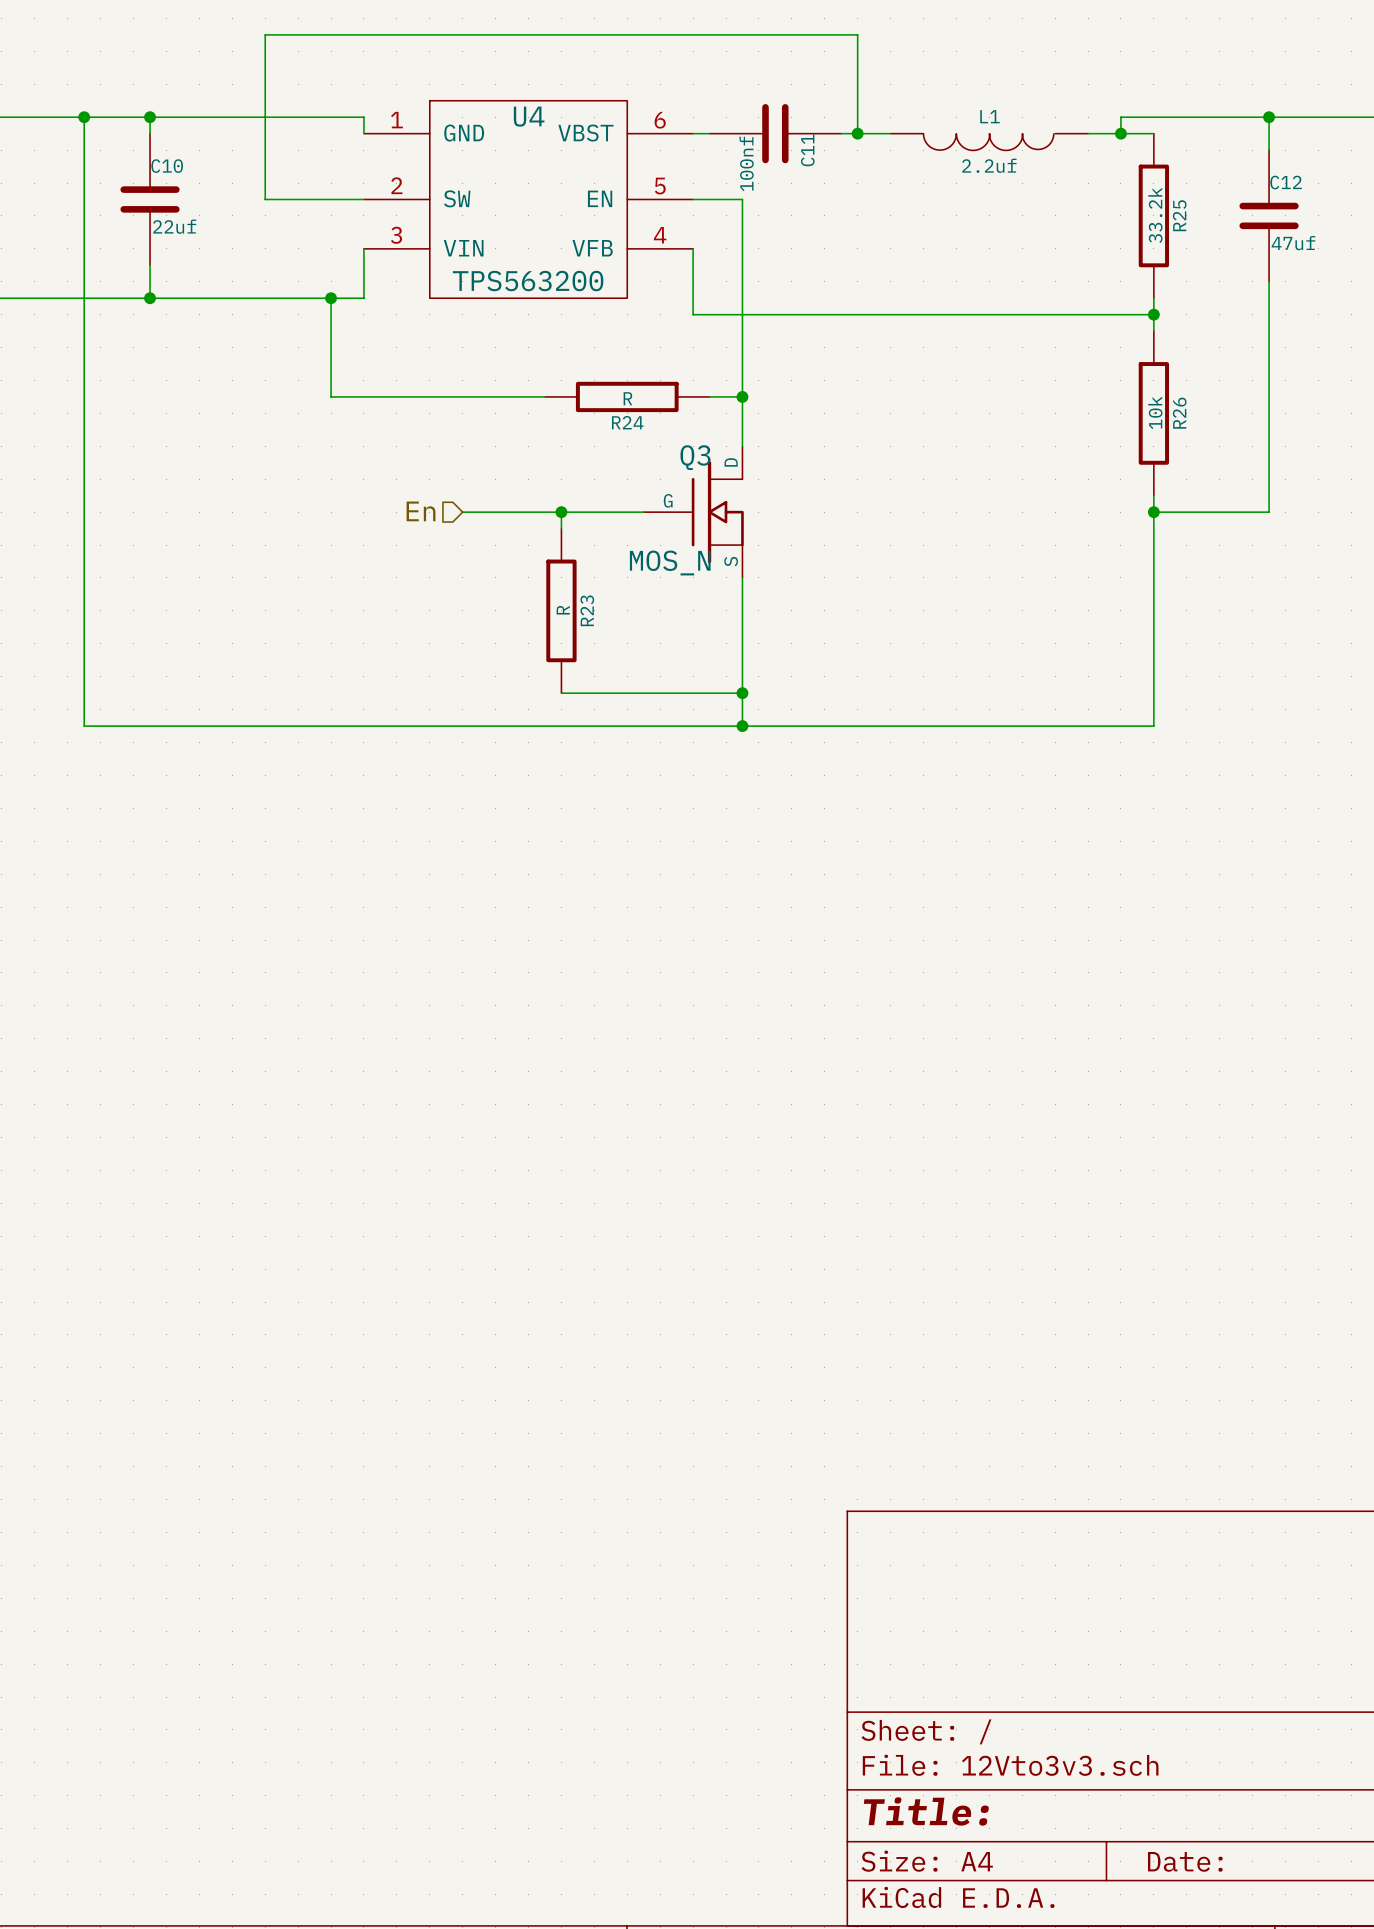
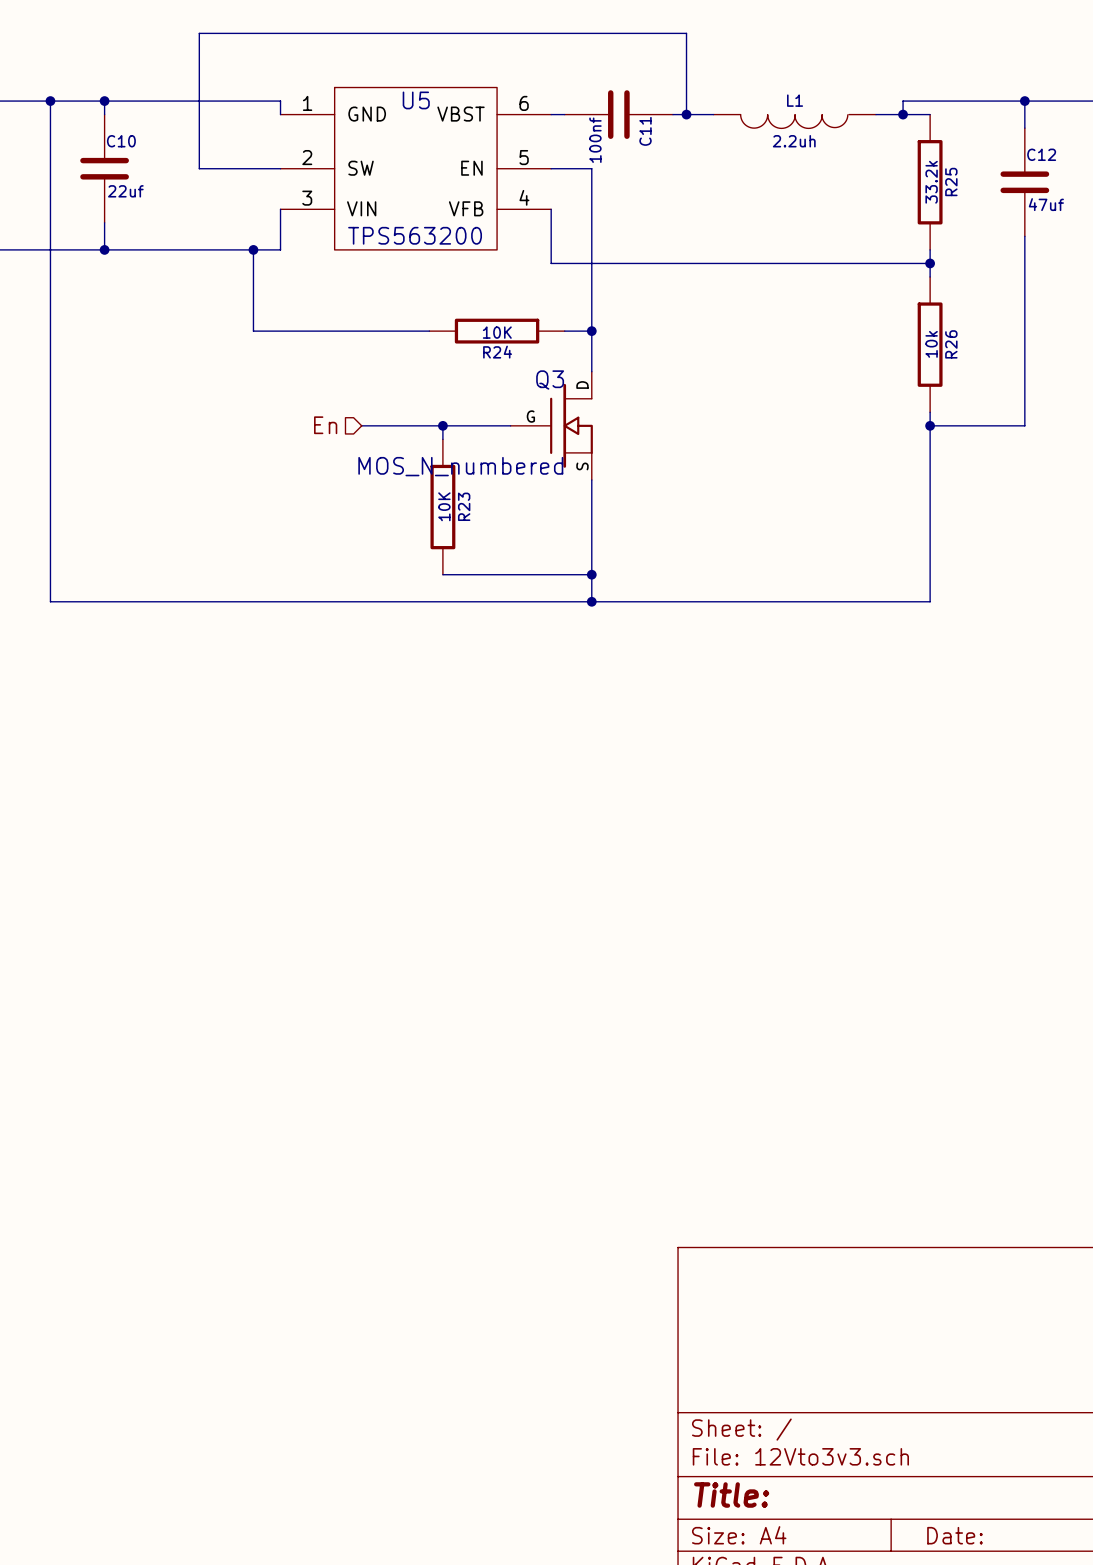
U4 name: U4 (529, 116) -> U5 (416, 100)
L1 value: 2.2uf (989, 165) -> 2.2uh (794, 141)
R24 value: R (627, 398) -> 10K (497, 332)
Q3 value: MOS_N (670, 563) -> MOS_N_numbered (460, 466)
R23 value: R (563, 610) -> 10K (444, 506)

